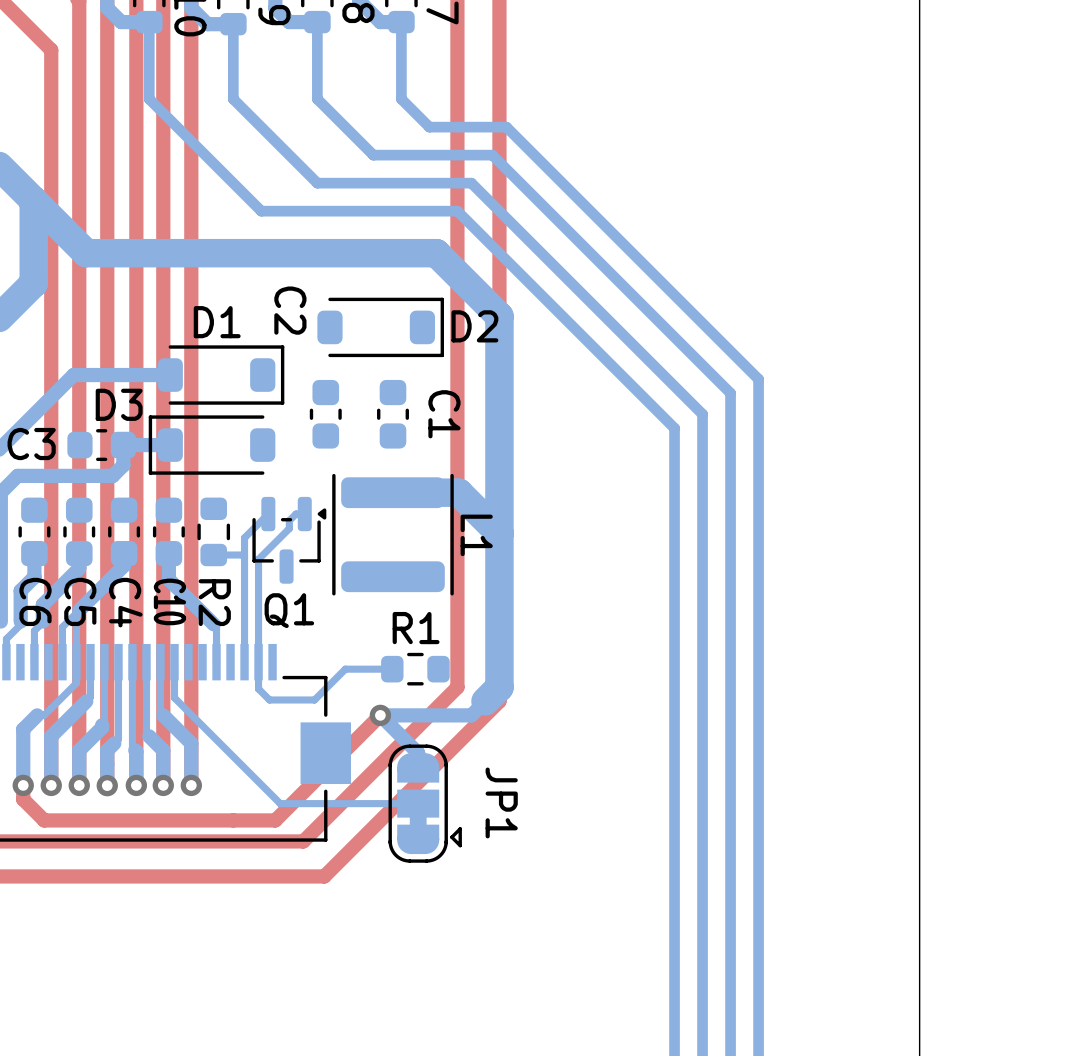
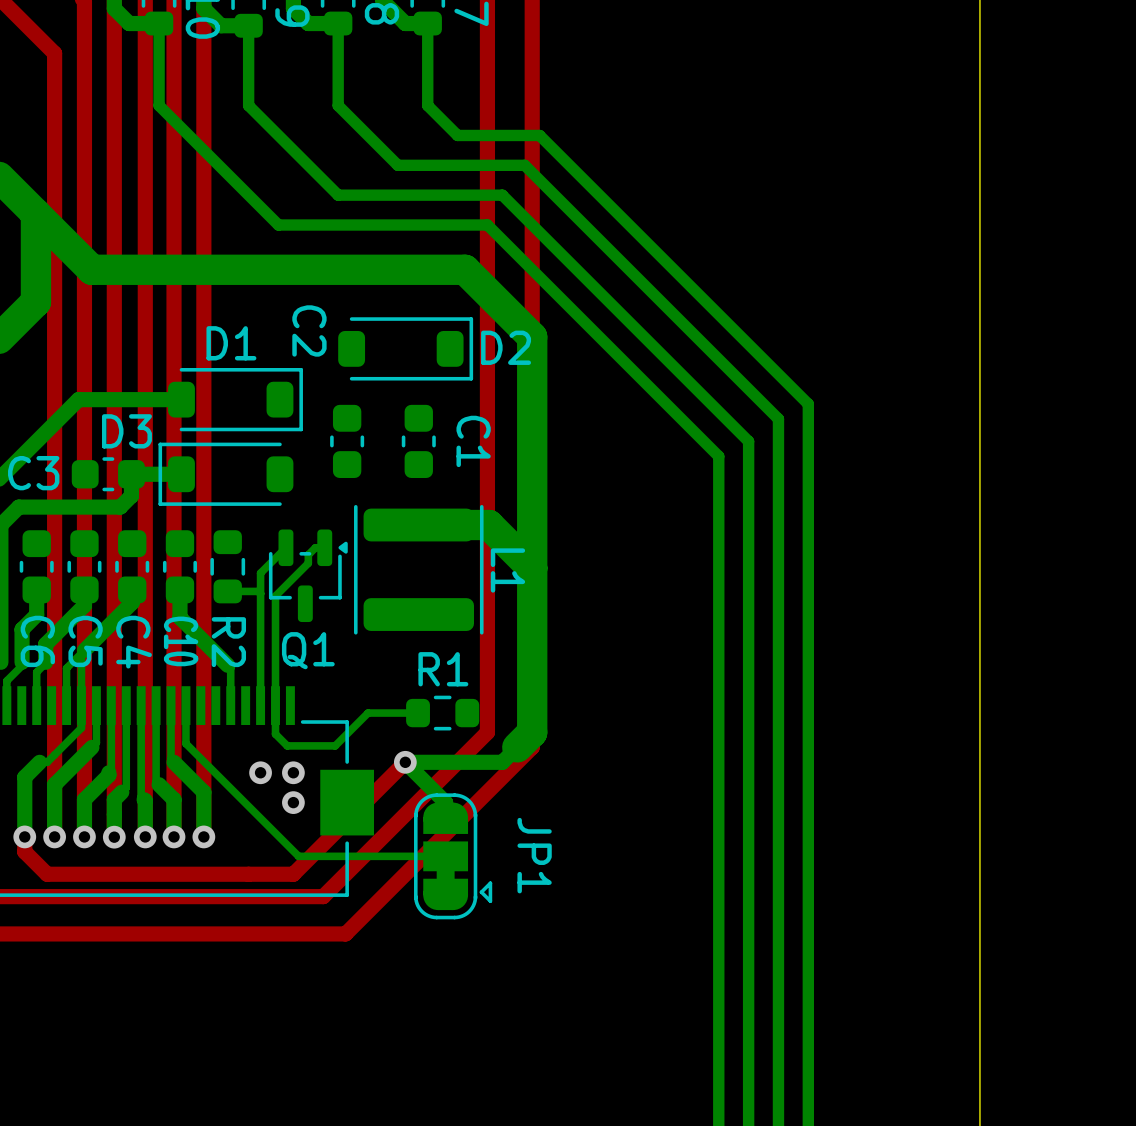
via: none -> (260, 772)
via: none -> (293, 772)
via: none -> (293, 802)

